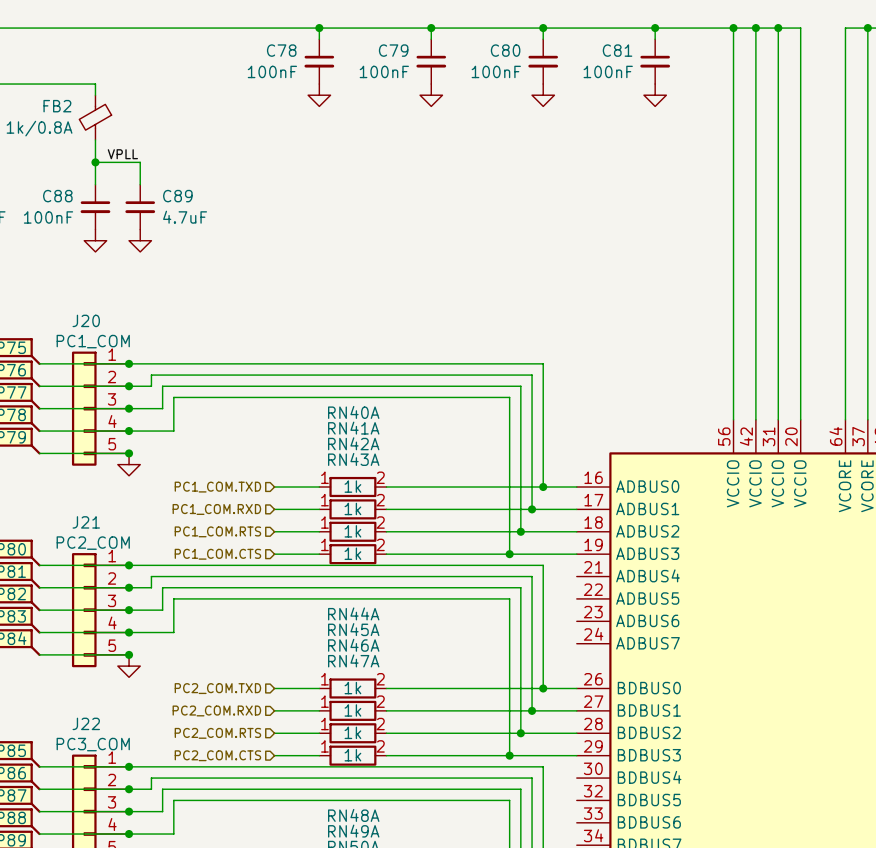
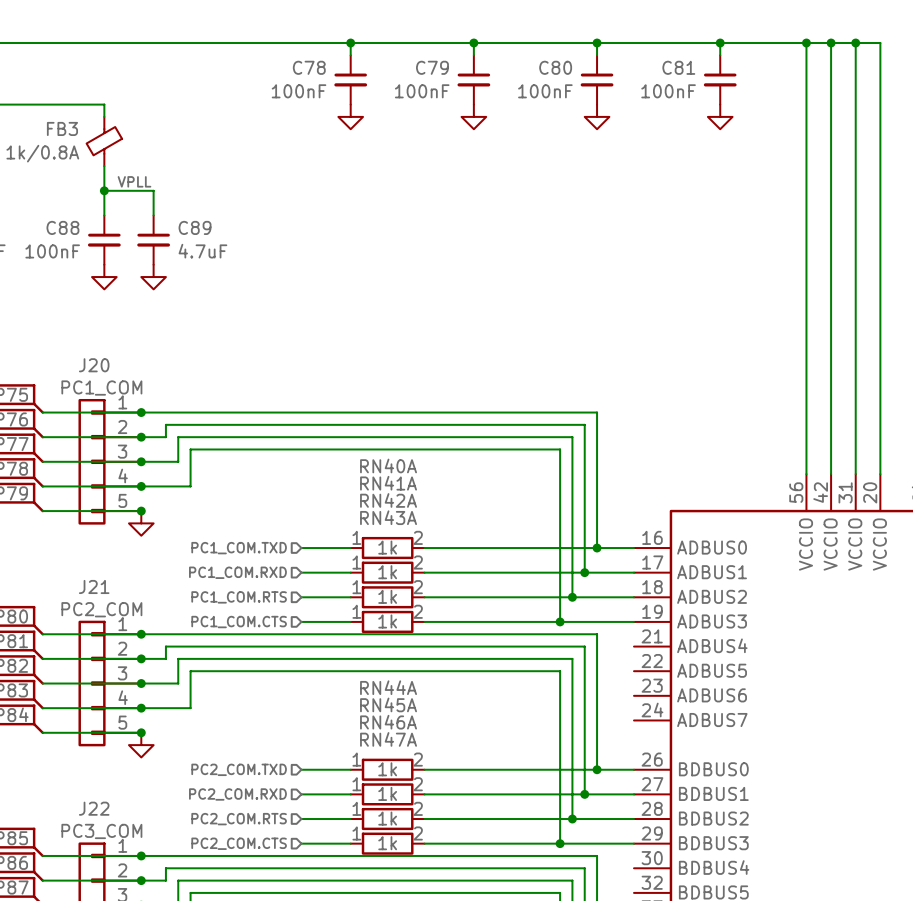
FB2 name: FB2 (57, 106) -> FB3 (62, 128)

